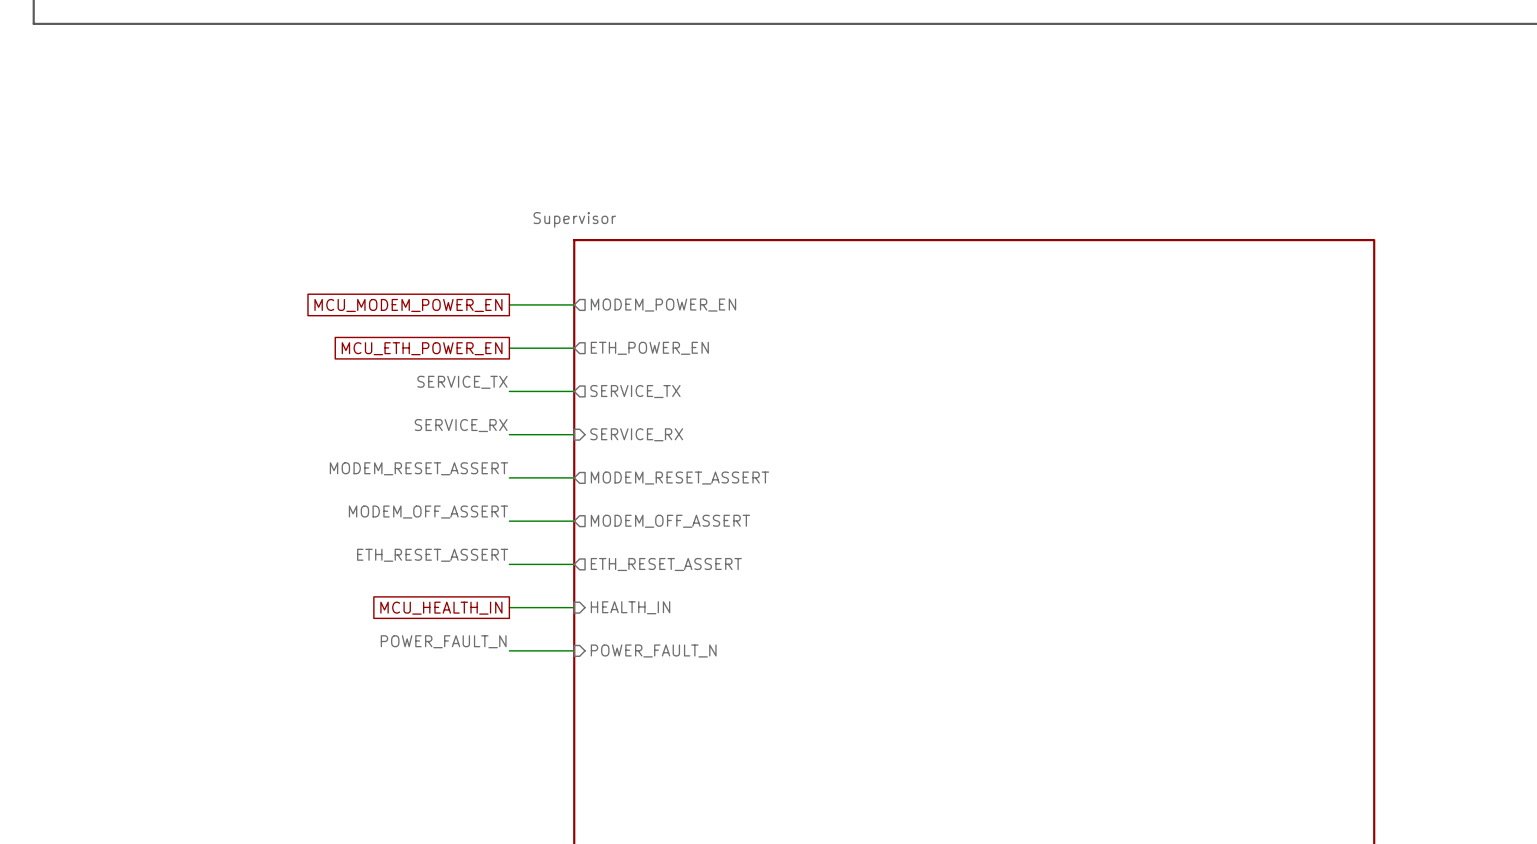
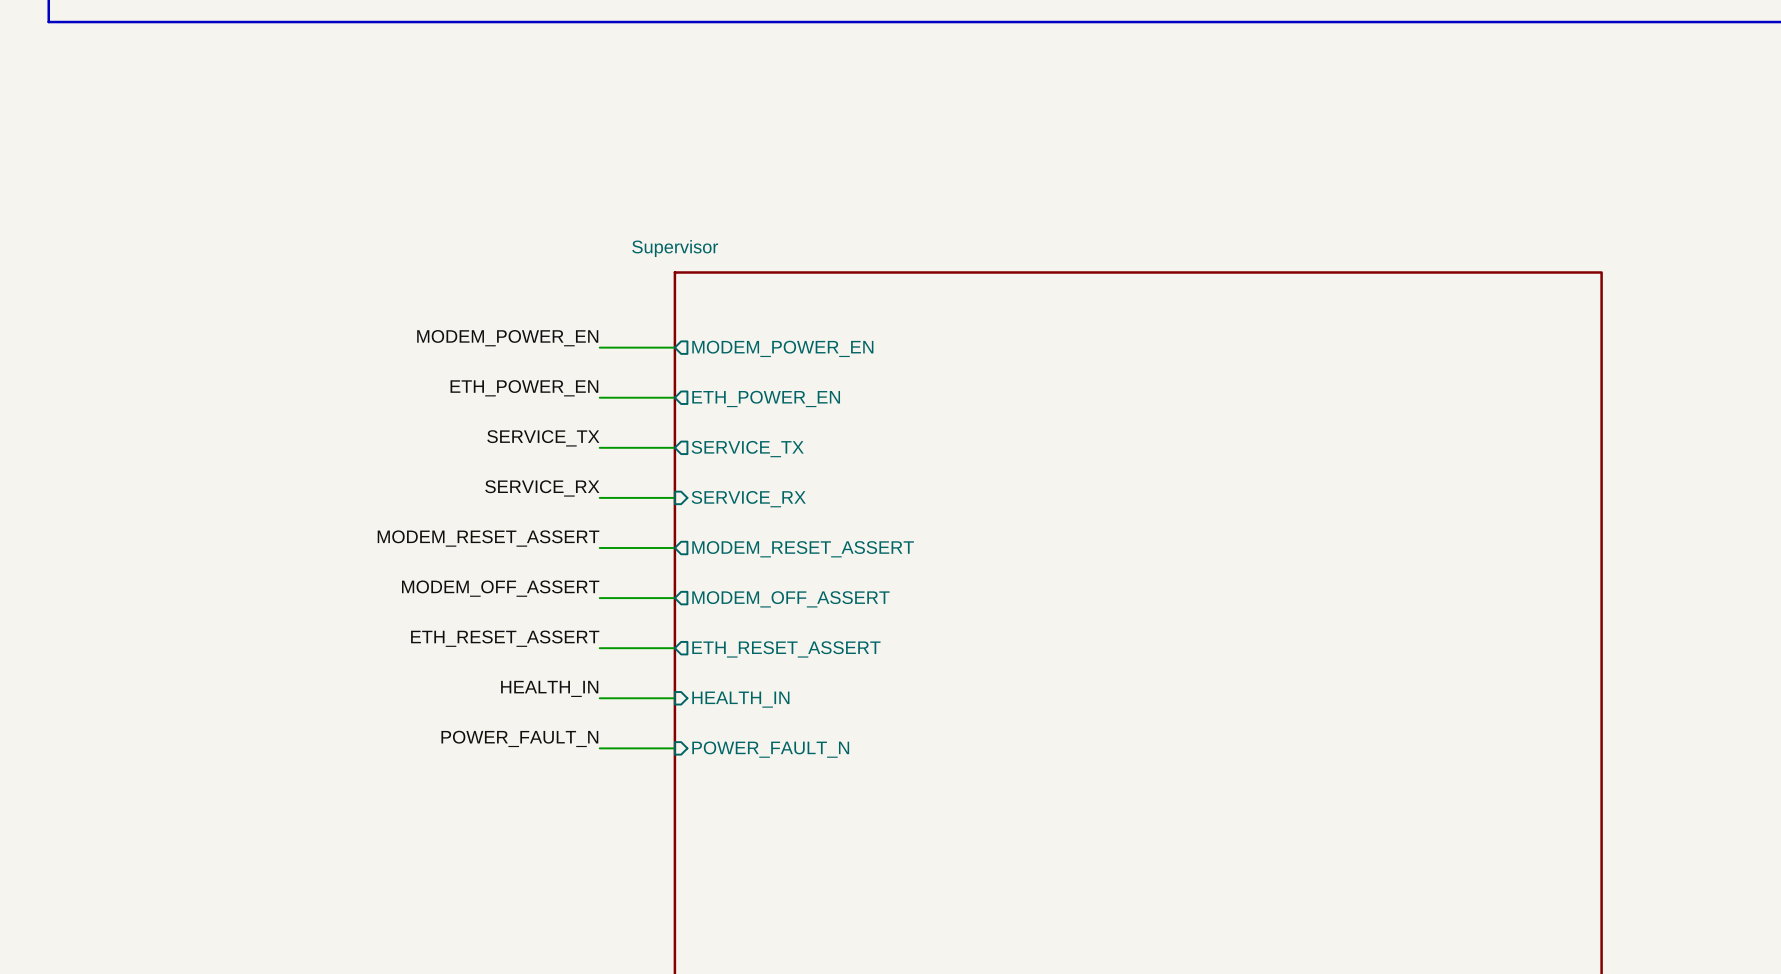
label: none -> MODEM_POWER_EN (507, 338)
global label: MCU_MODEM_POWER_EN (408, 305) -> none
label: none -> ETH_POWER_EN (524, 388)
global label: MCU_ETH_POWER_EN (422, 348) -> none
label: none -> HEALTH_IN (549, 688)
global label: MCU_HEALTH_IN (441, 608) -> none

